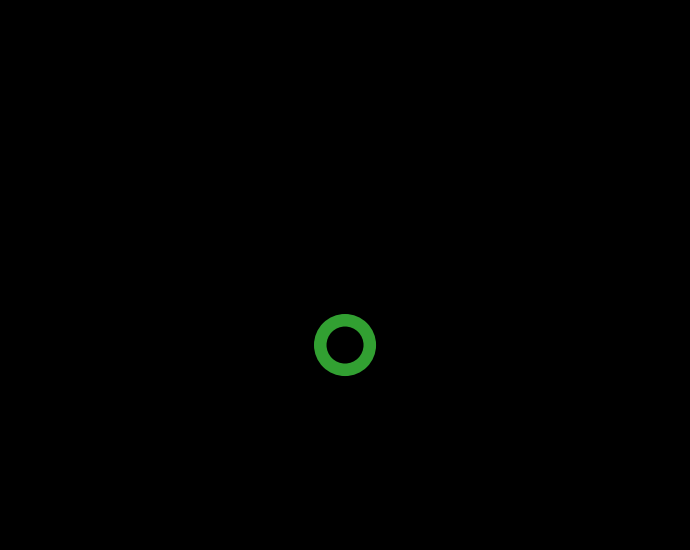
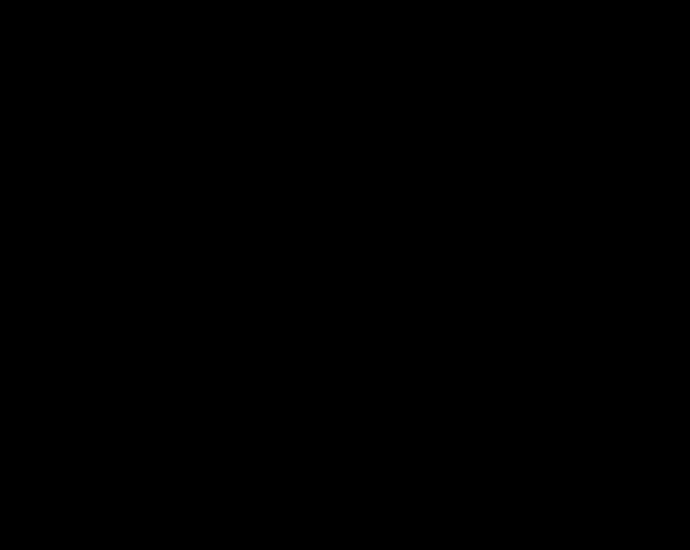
via: (345, 345) -> none

